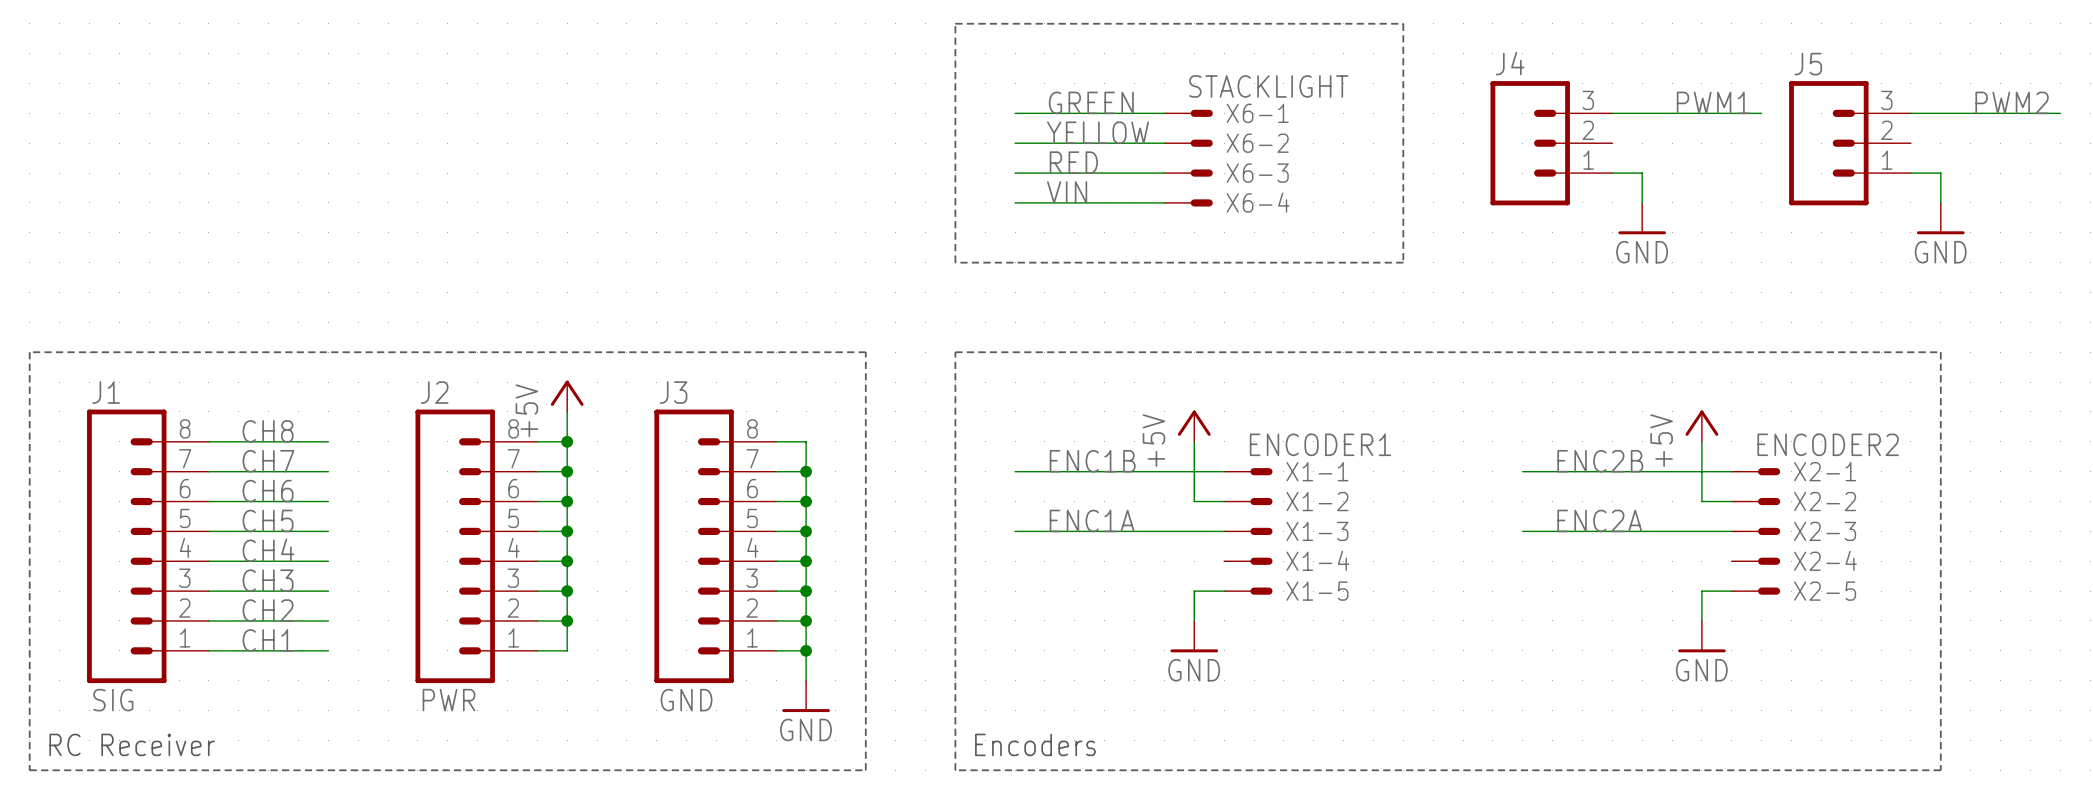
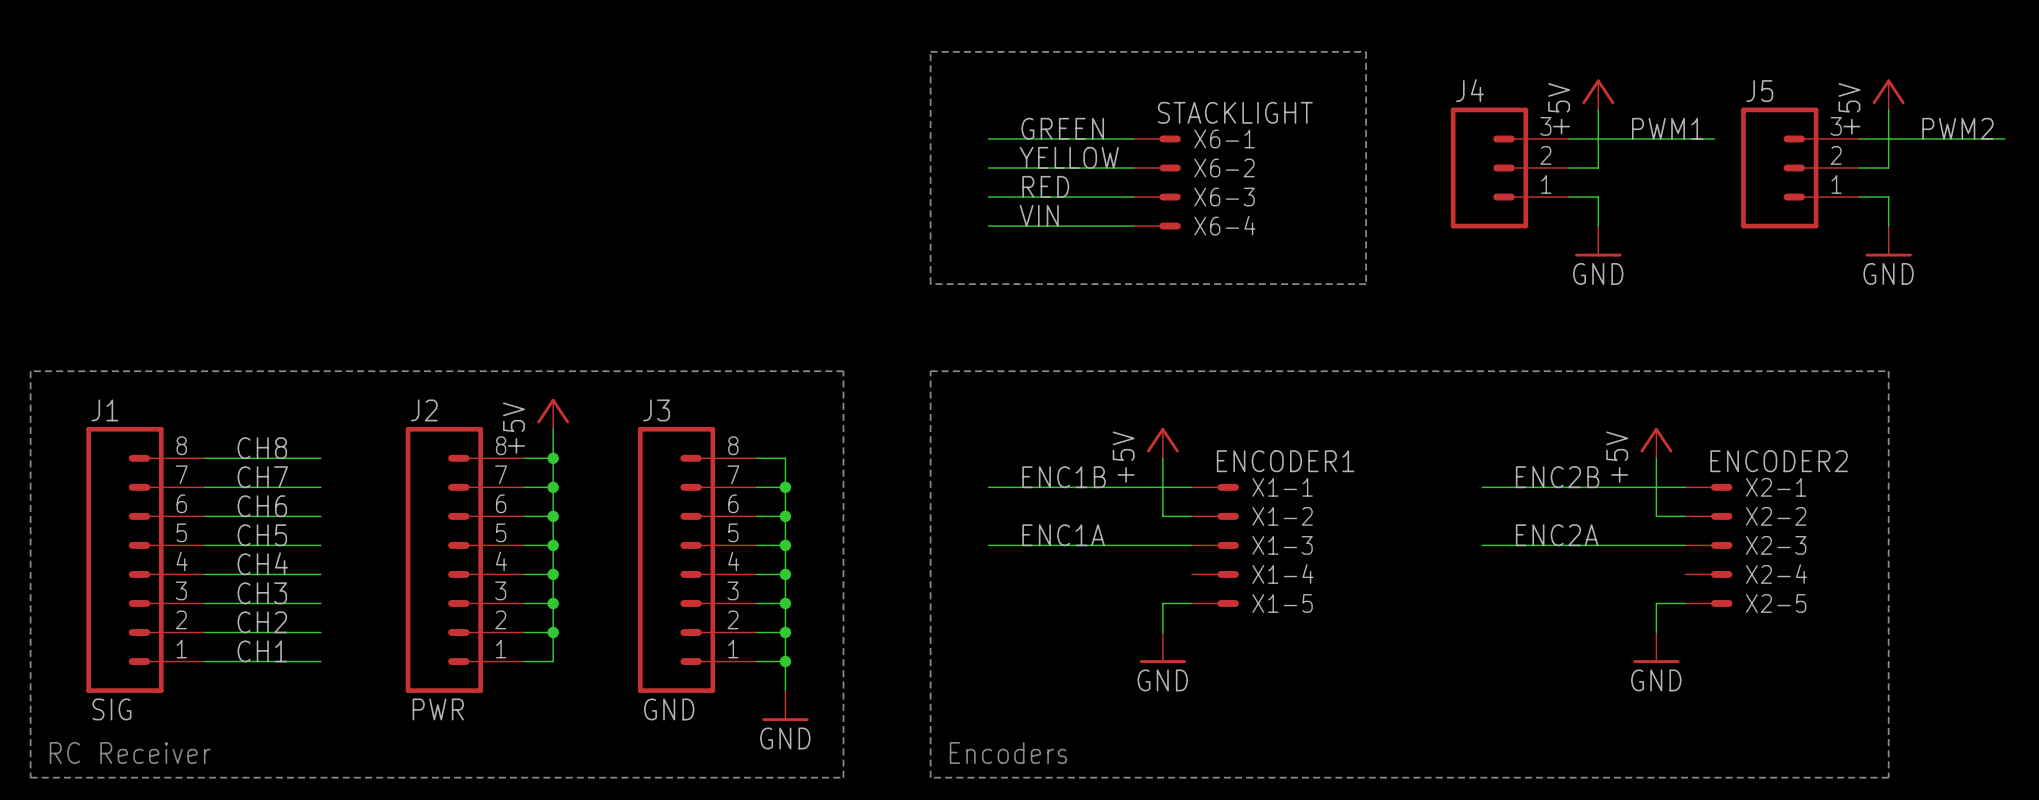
power symbol: none -> +5V (1598, 94)
power symbol: none -> +5V (1888, 94)
wire: none -> (1598, 109) (1598, 168) (1569, 168)
wire: none -> (1888, 109) (1888, 168) (1859, 168)

